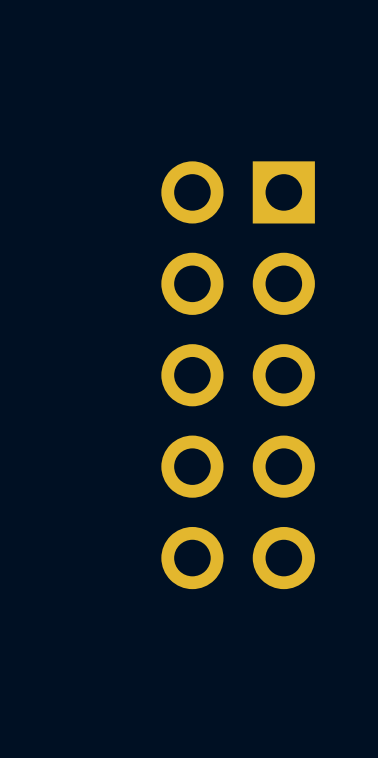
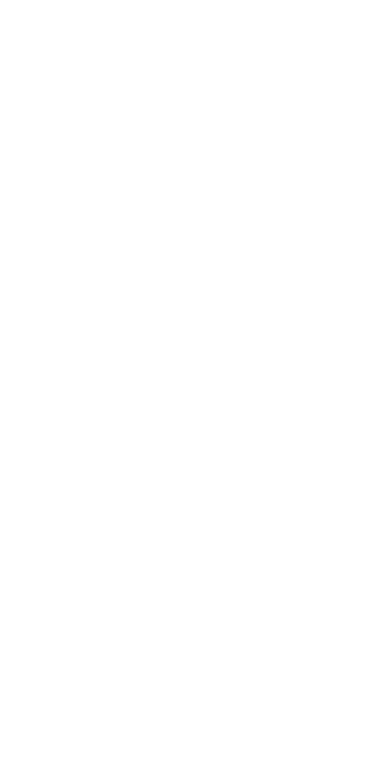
part: (238, 375) -> none

